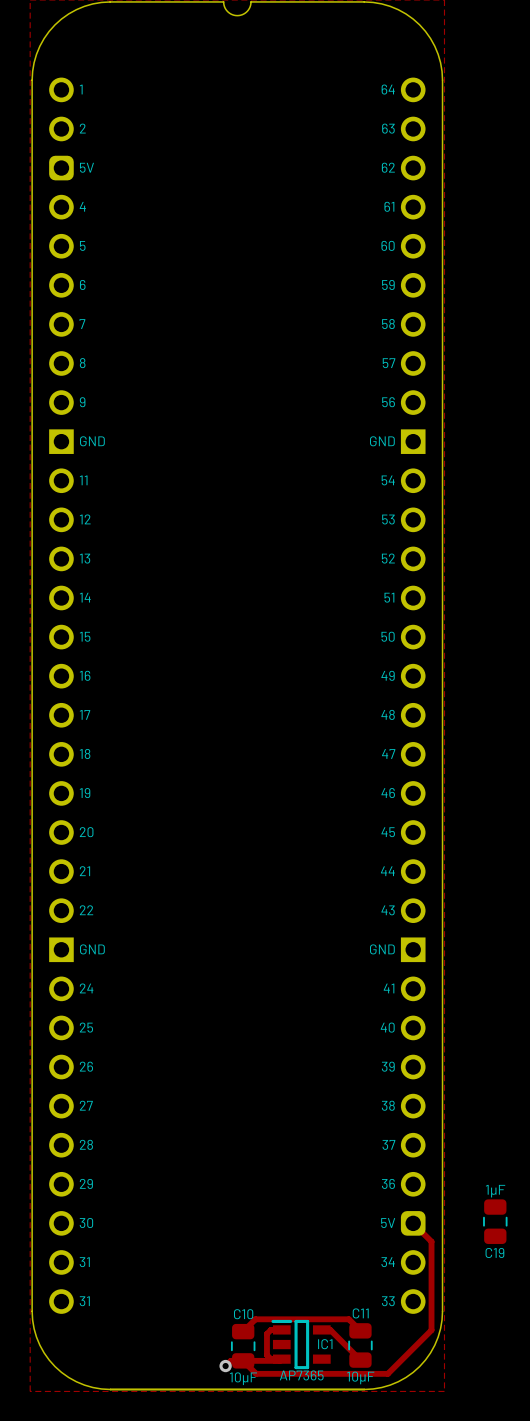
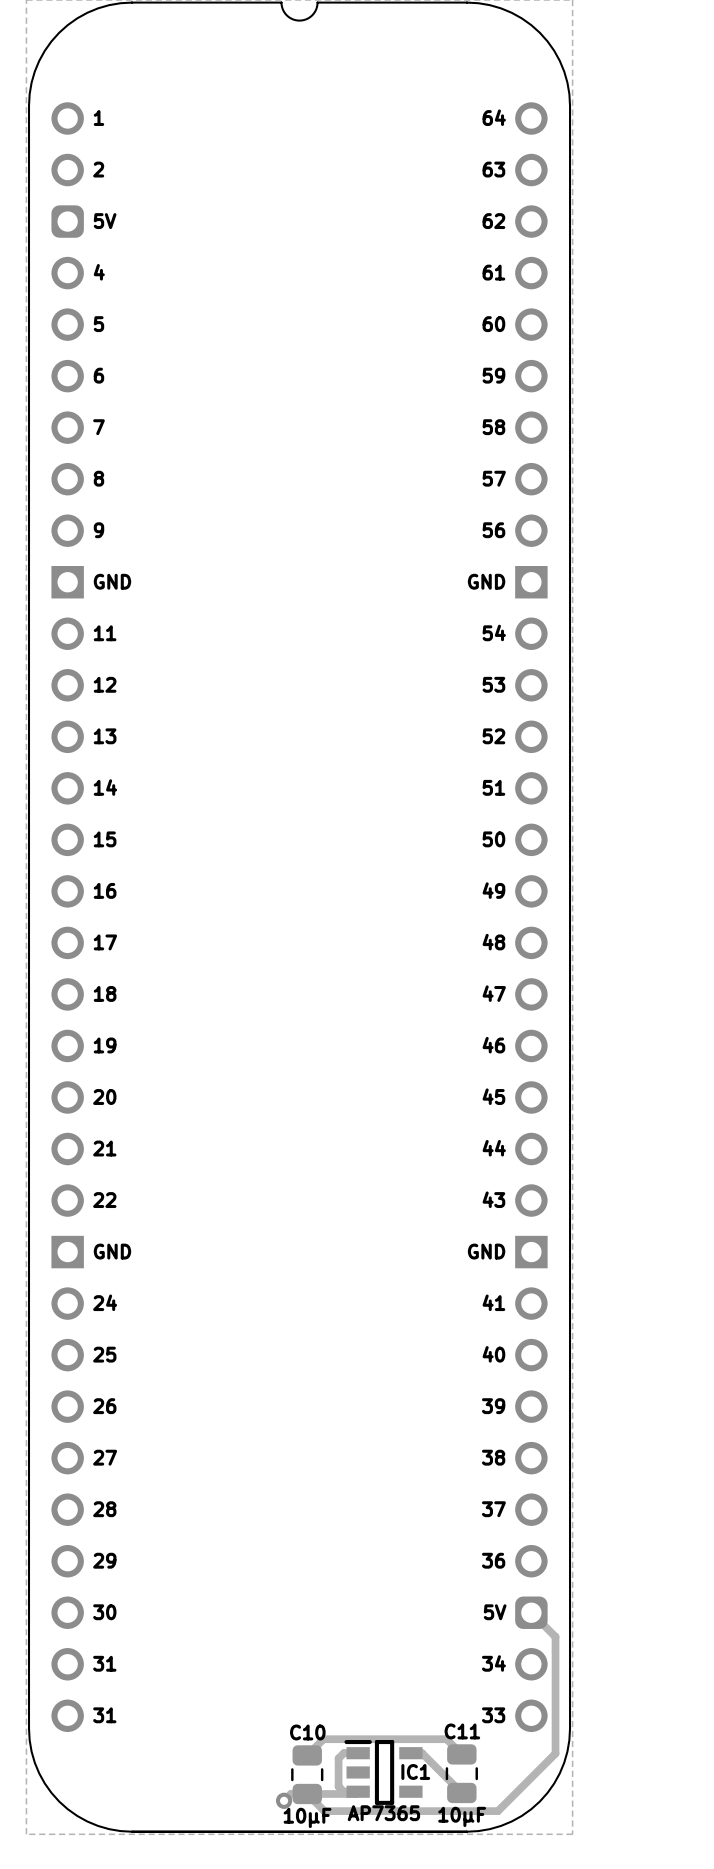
C19: 1μF (495, 1221) -> none

